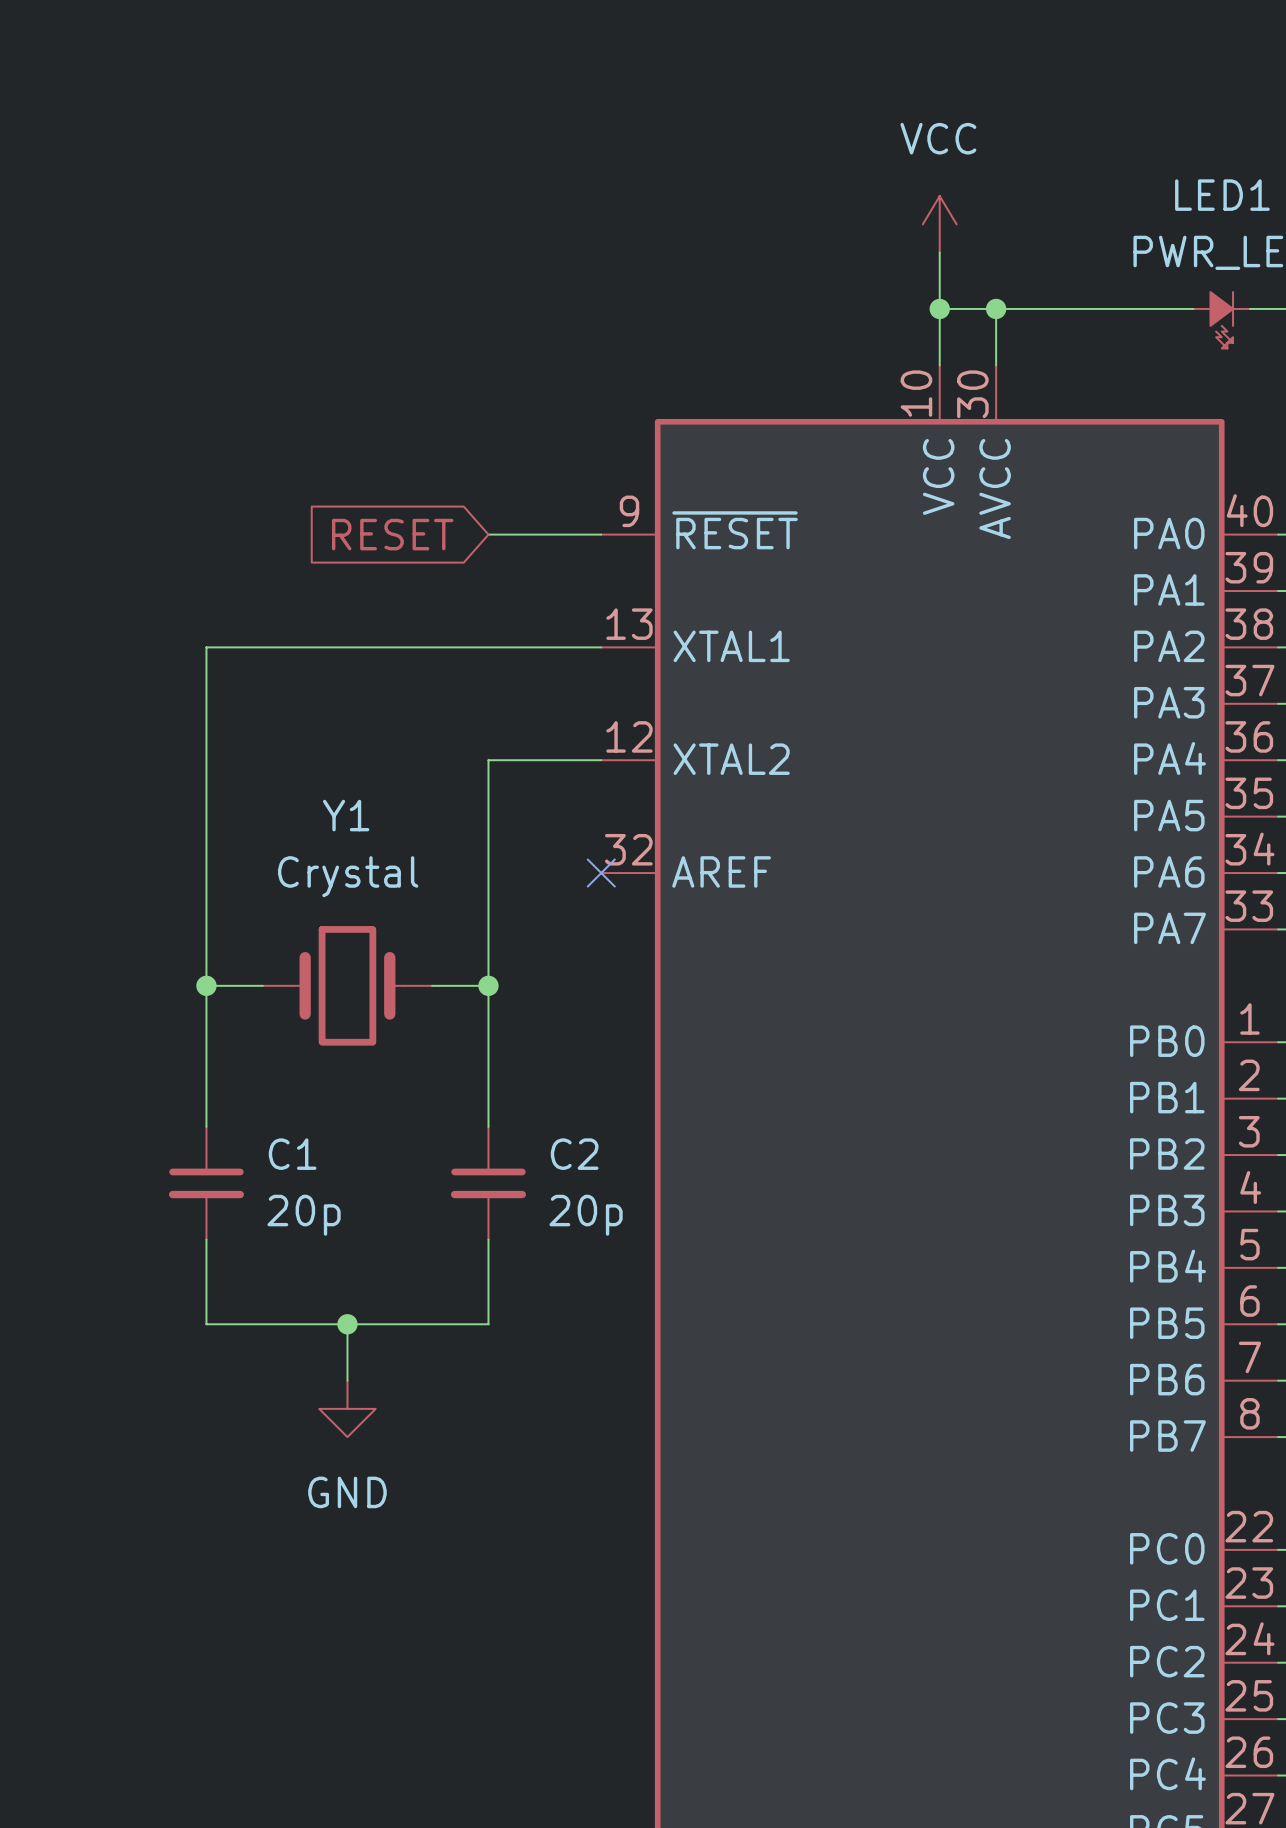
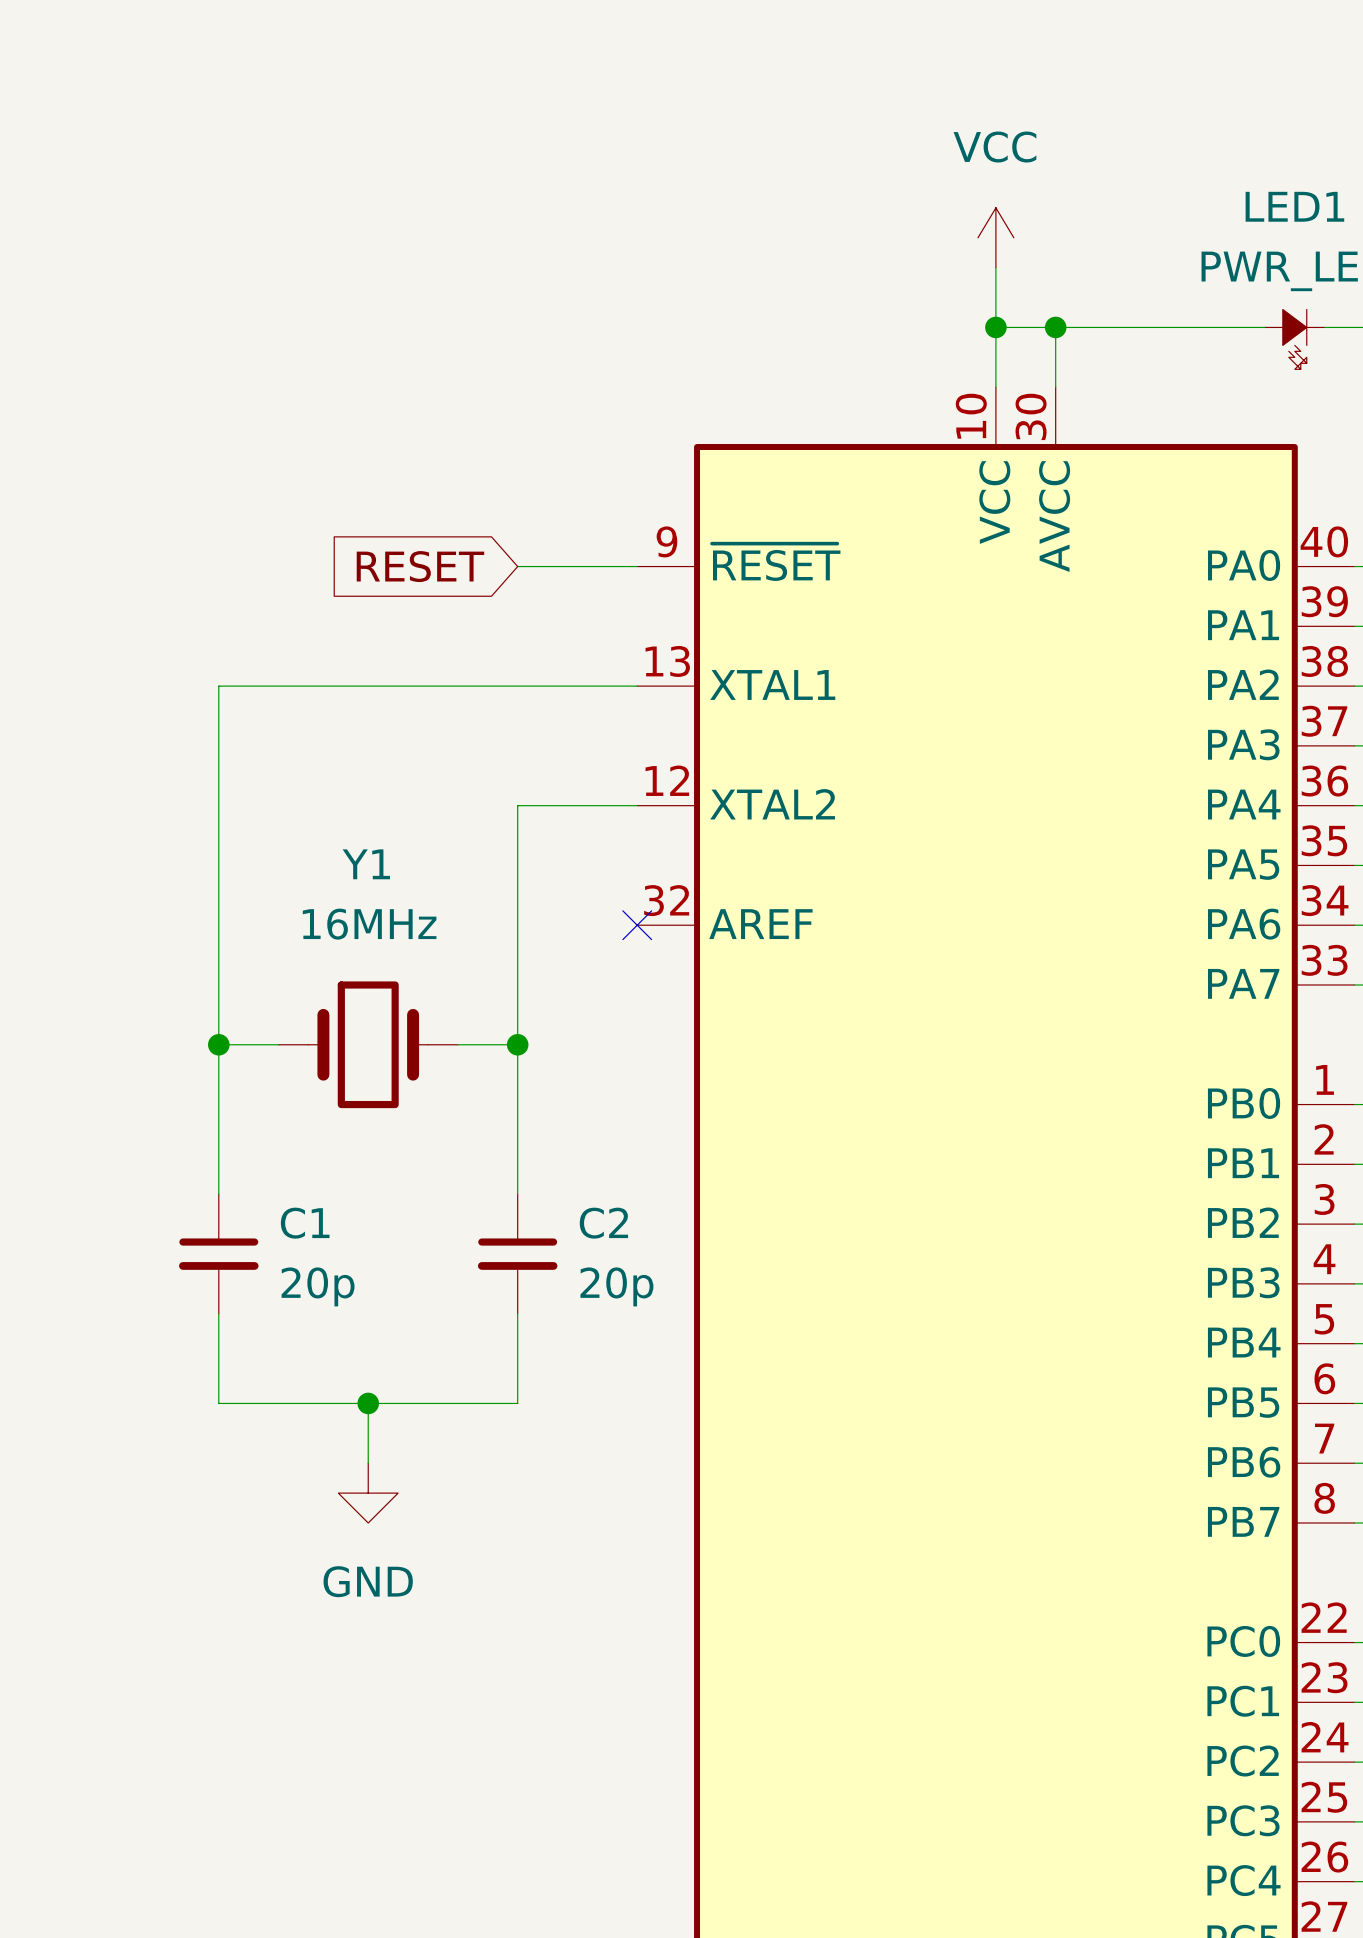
Y1 value: Crystal (348, 876) -> 16MHz (369, 924)

